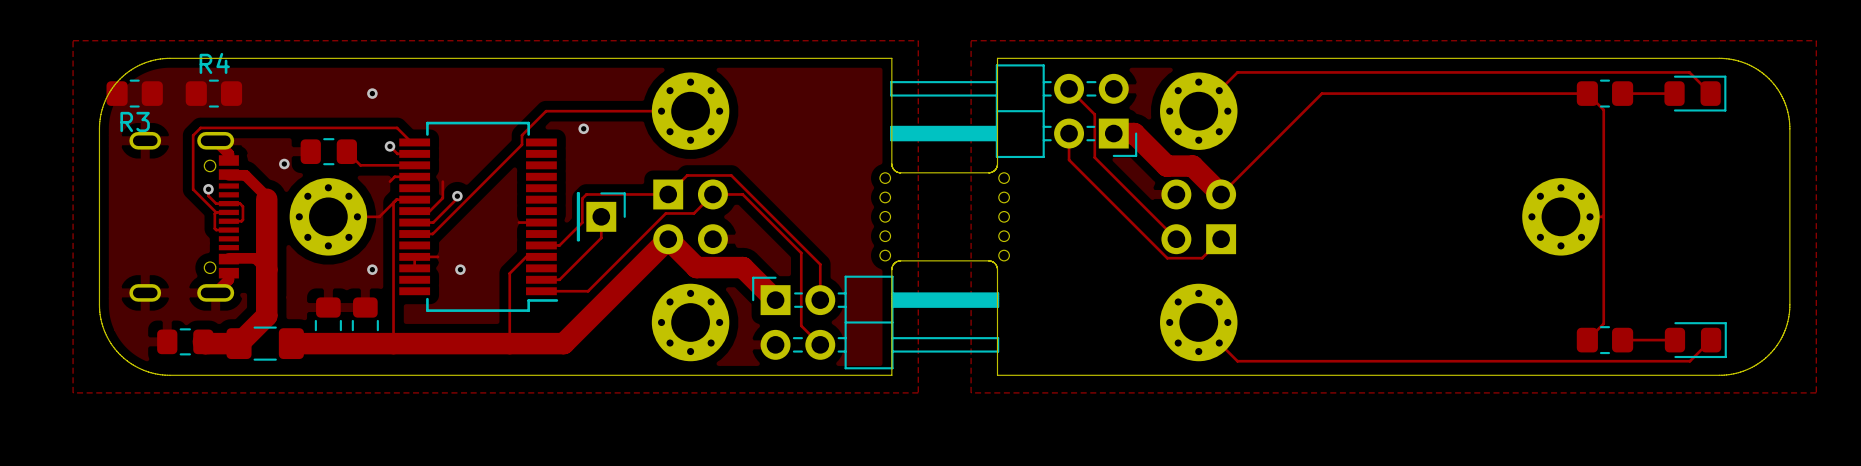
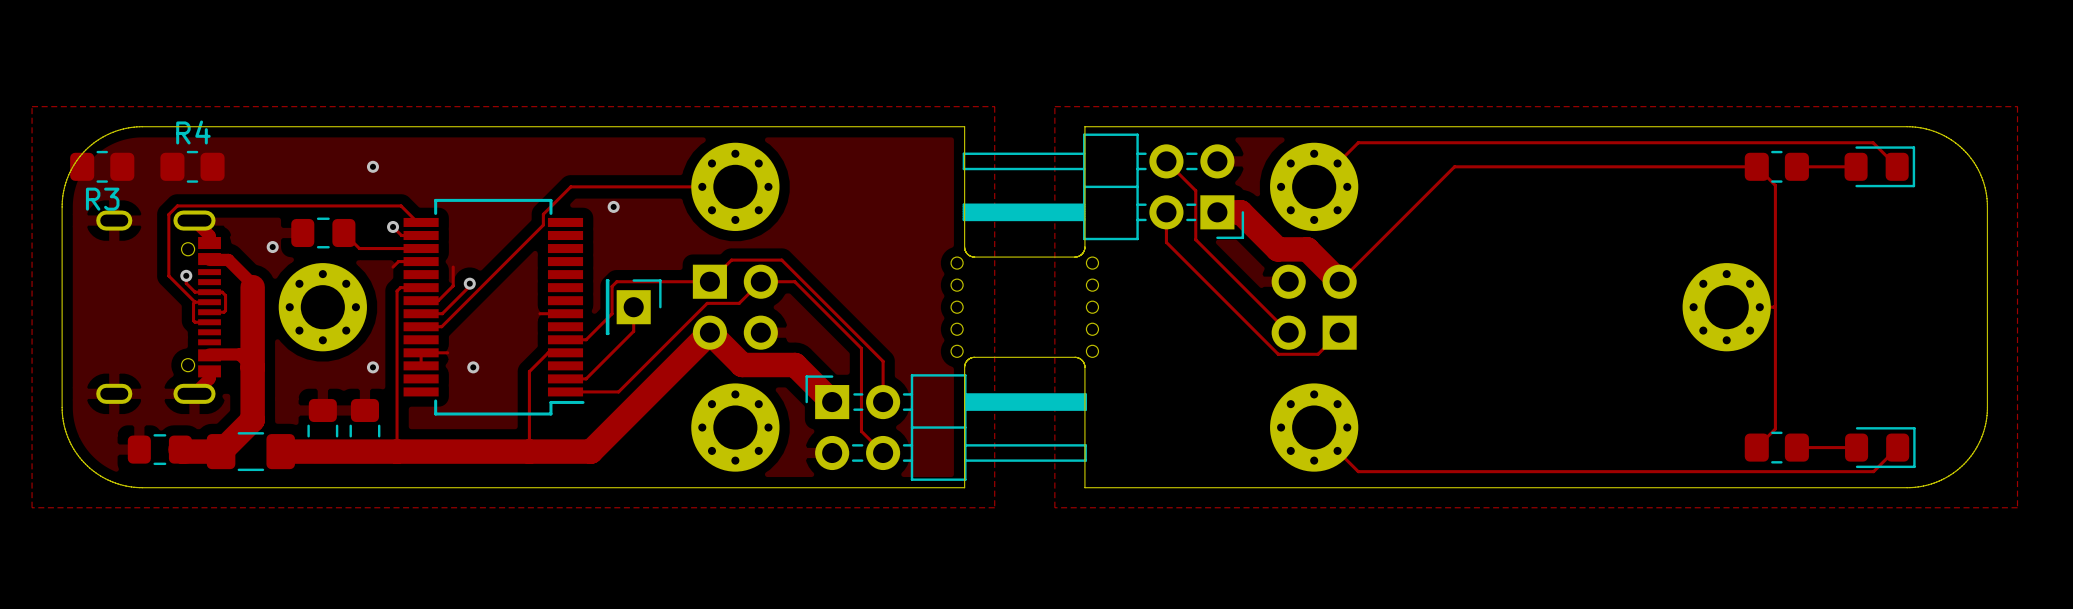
track: (393, 202) (379, 216) (328, 216) -> none

